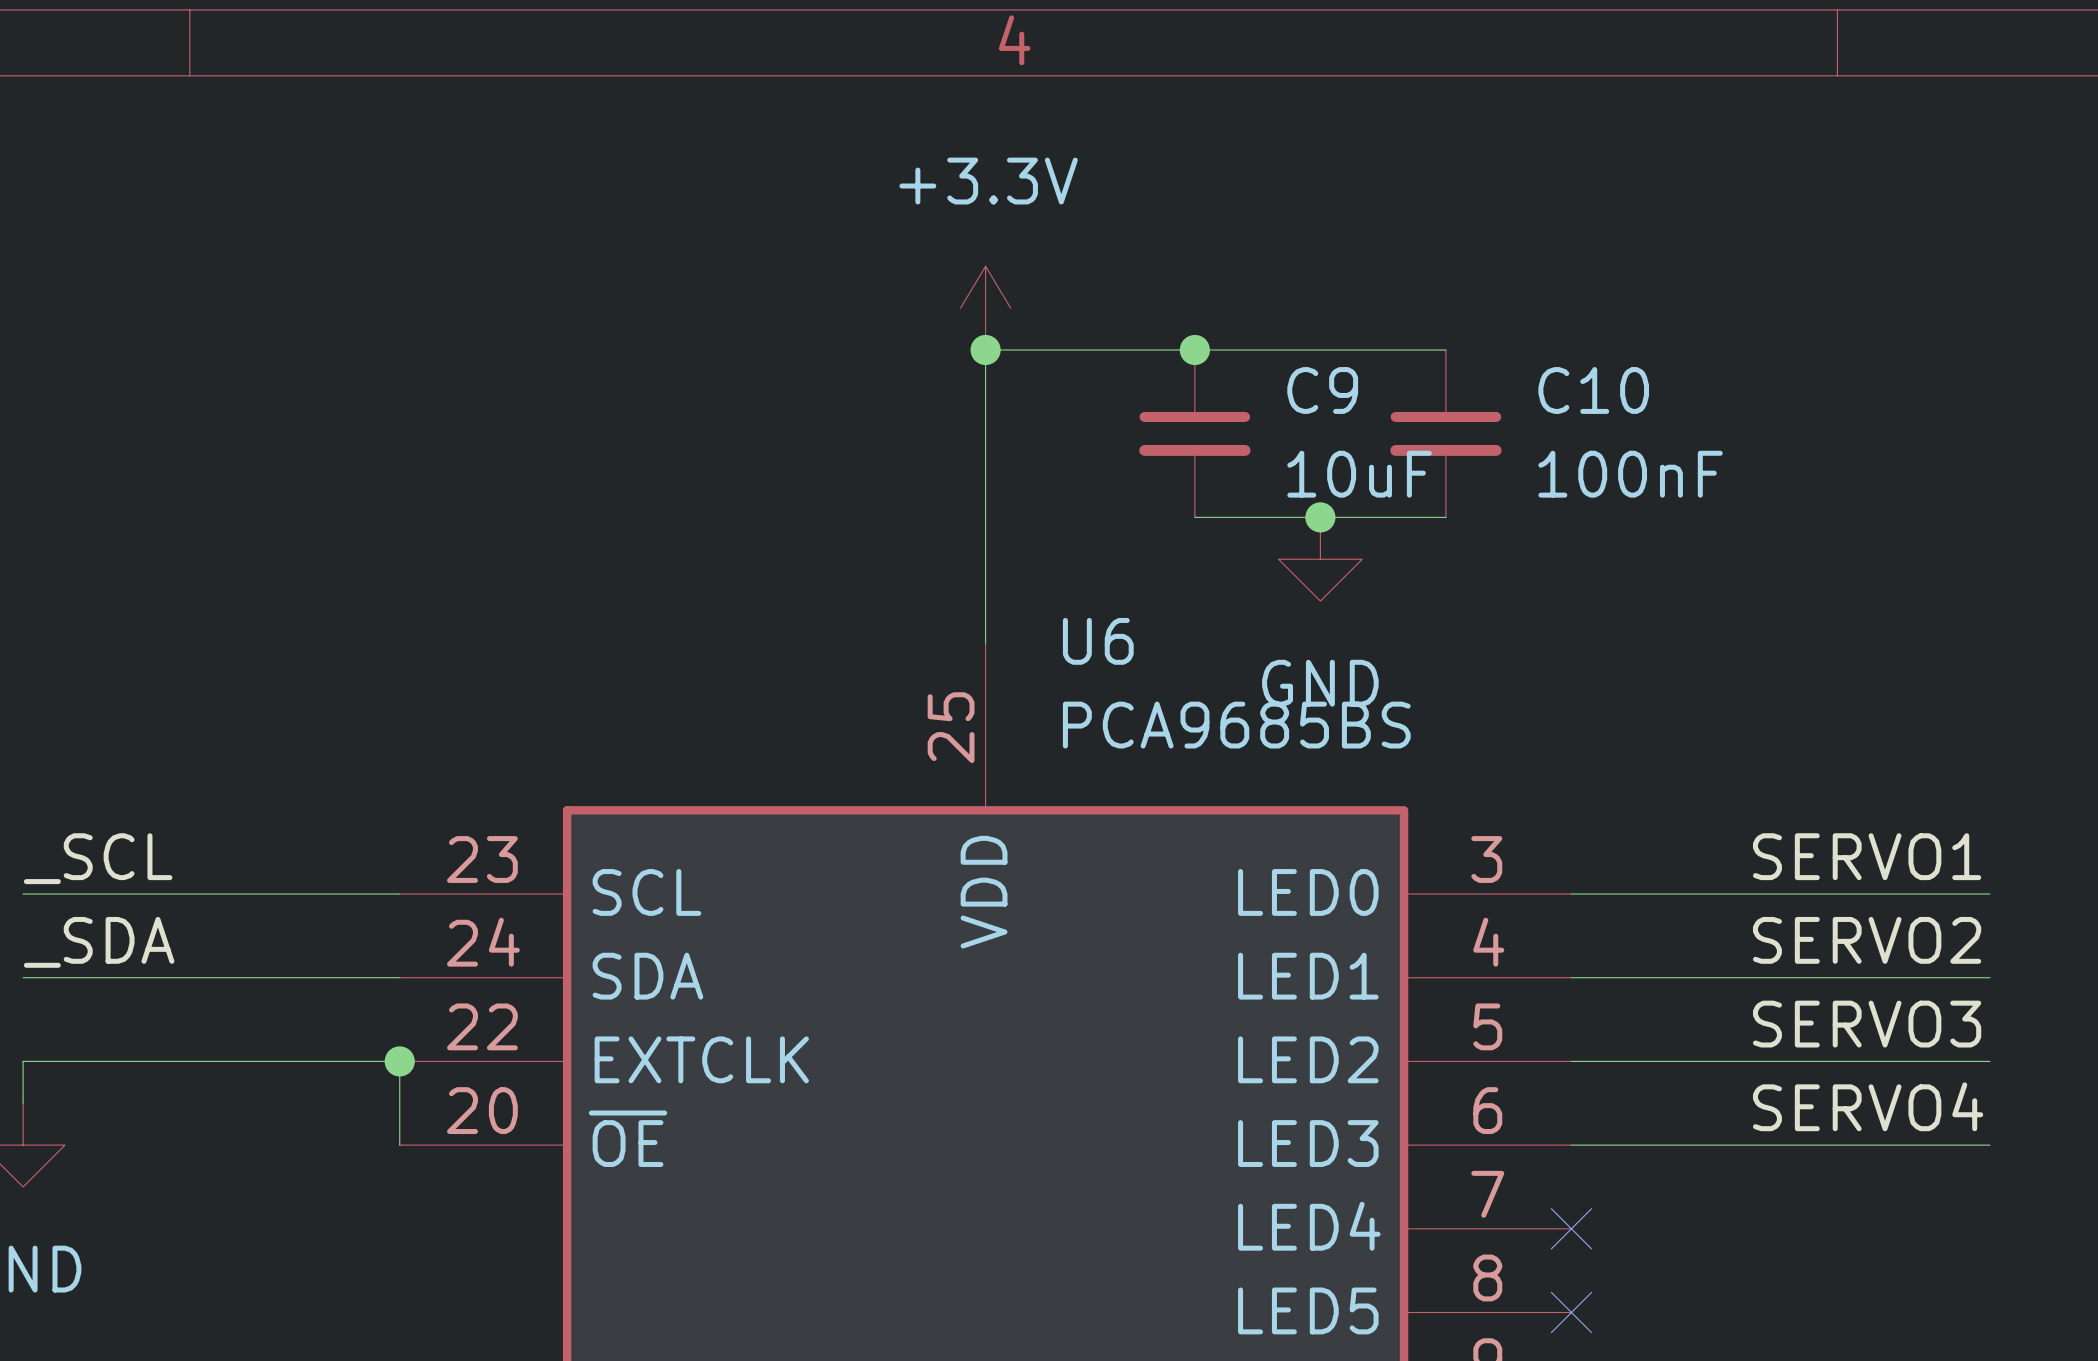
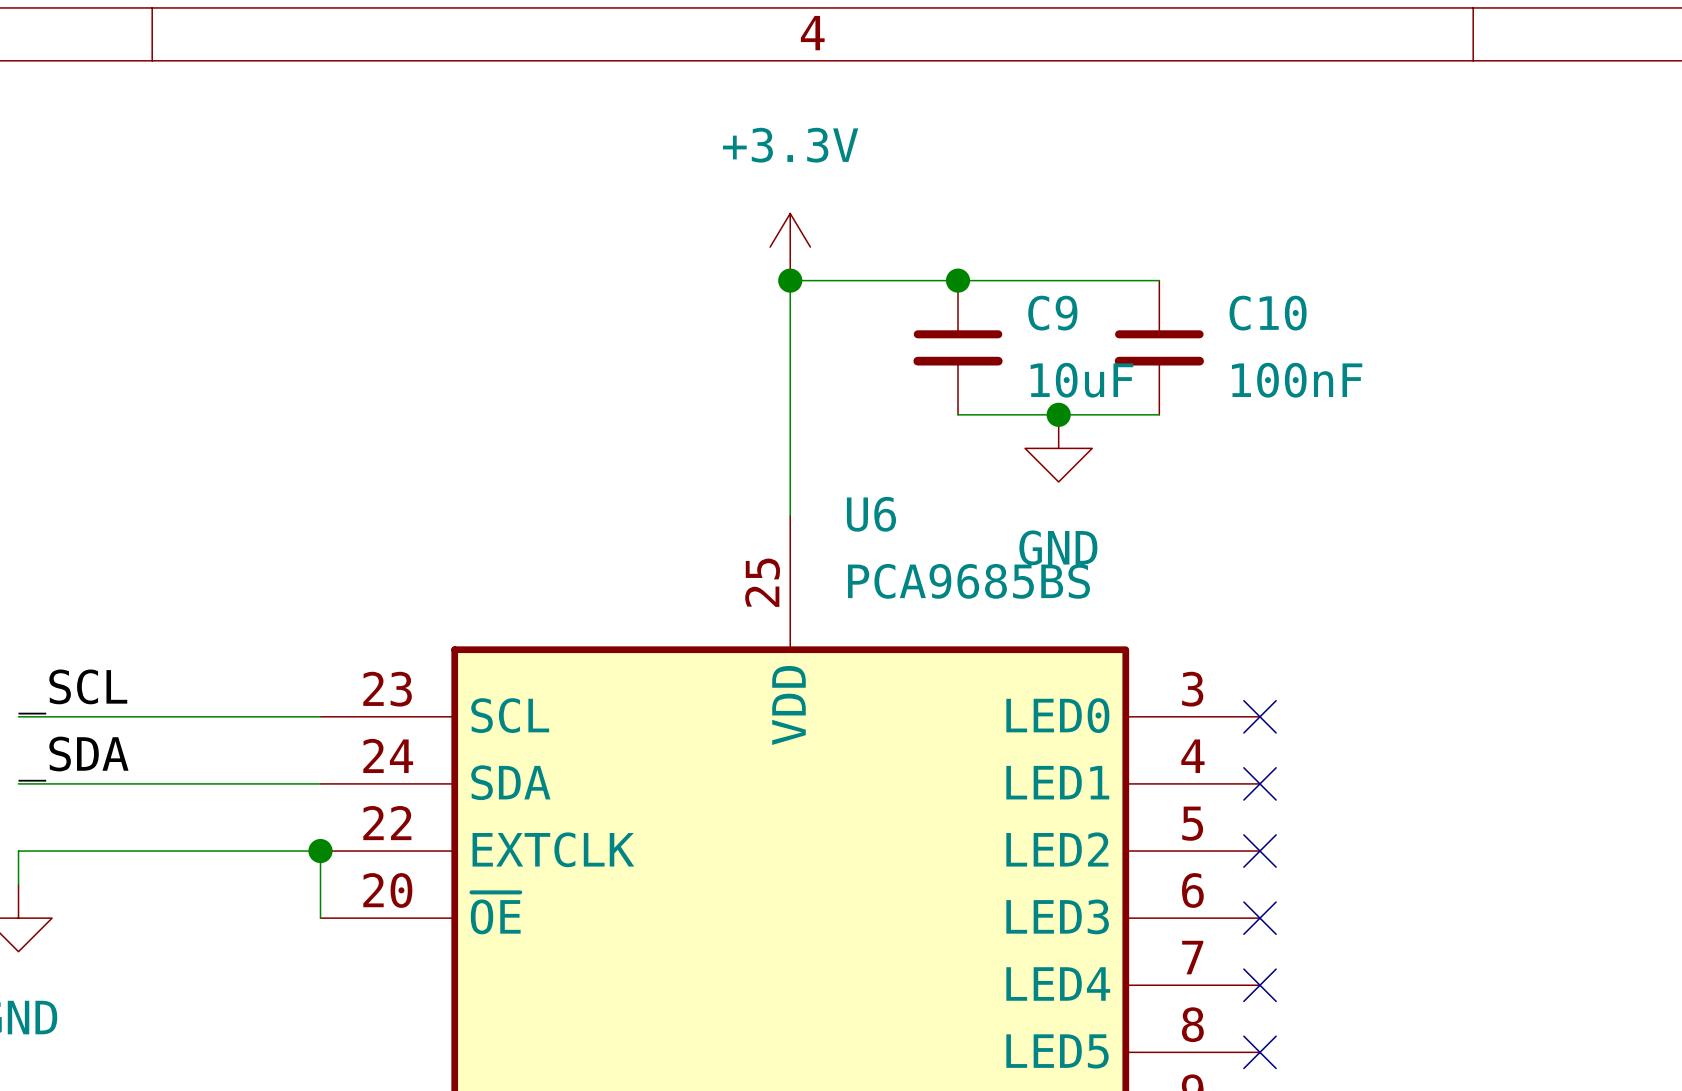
label: SERVO1 (1867, 856) -> none
wire: (1571, 894) (1989, 894) -> none
no-connect mark: none -> (1259, 716)
label: SERVO2 (1867, 940) -> none
wire: (1571, 977) (1989, 977) -> none
no-connect mark: none -> (1259, 783)
label: SERVO3 (1867, 1024) -> none
wire: (1571, 1061) (1989, 1061) -> none
no-connect mark: none -> (1259, 851)
label: SERVO4 (1868, 1106) -> none
wire: (1571, 1145) (1989, 1145) -> none
no-connect mark: none -> (1259, 918)

